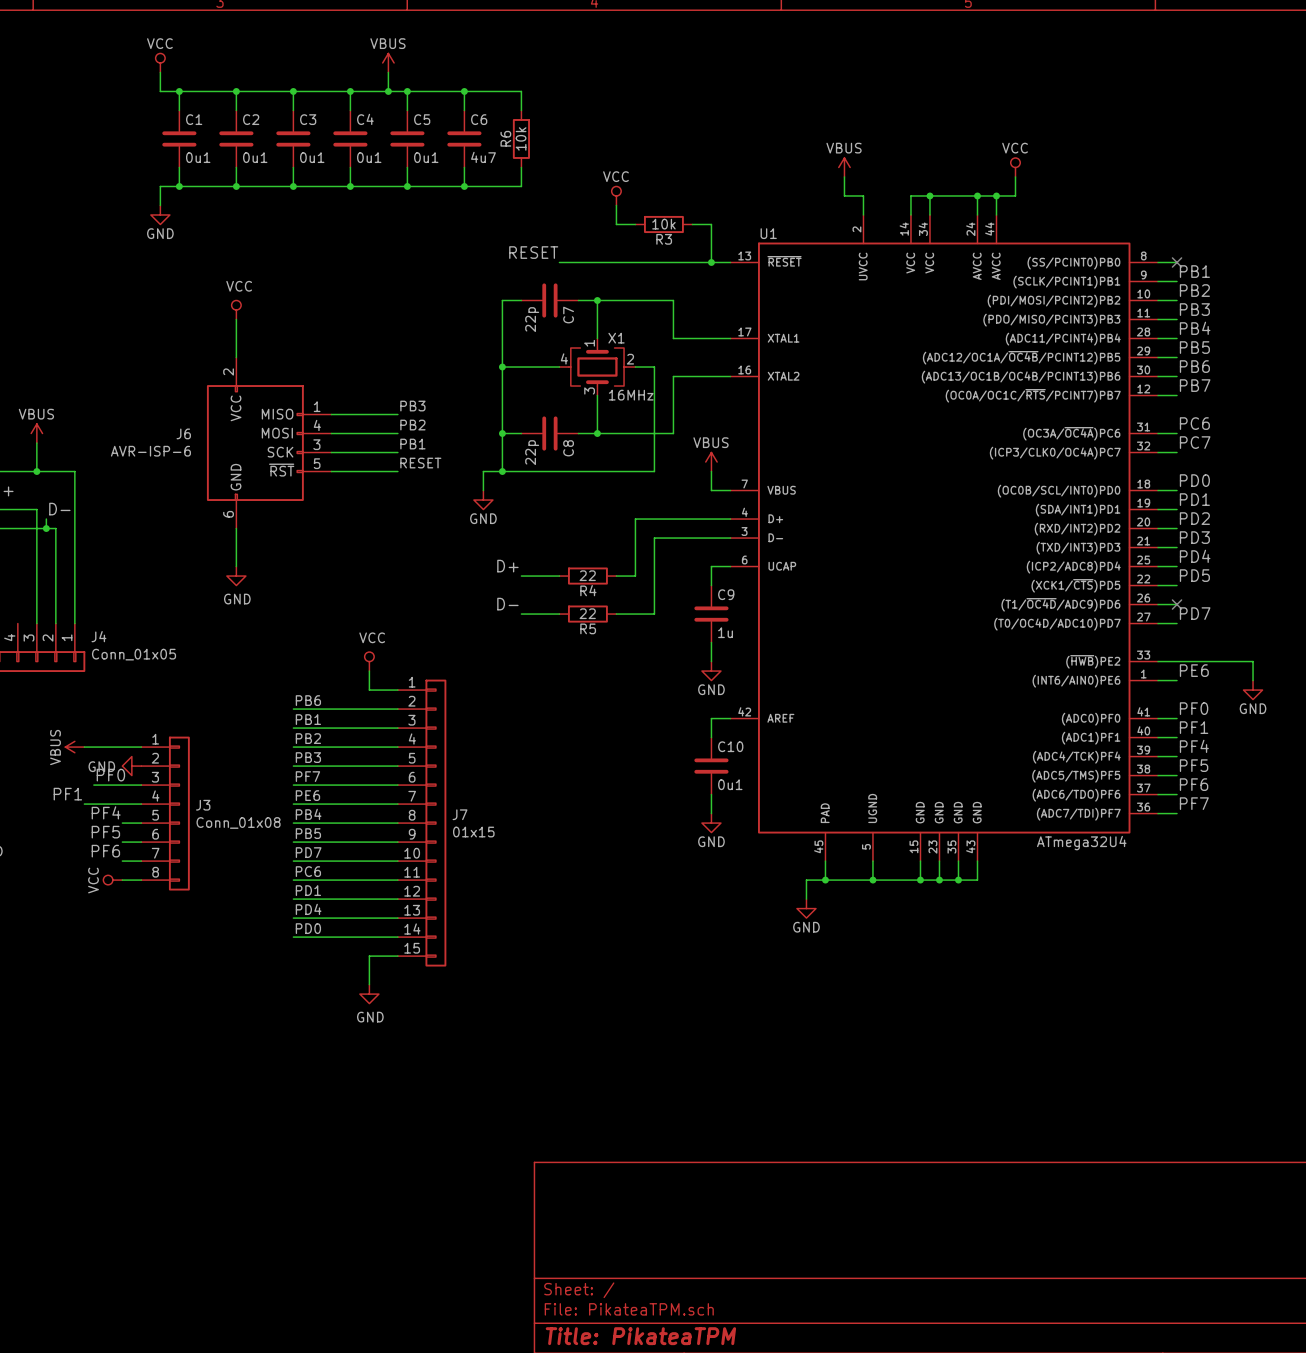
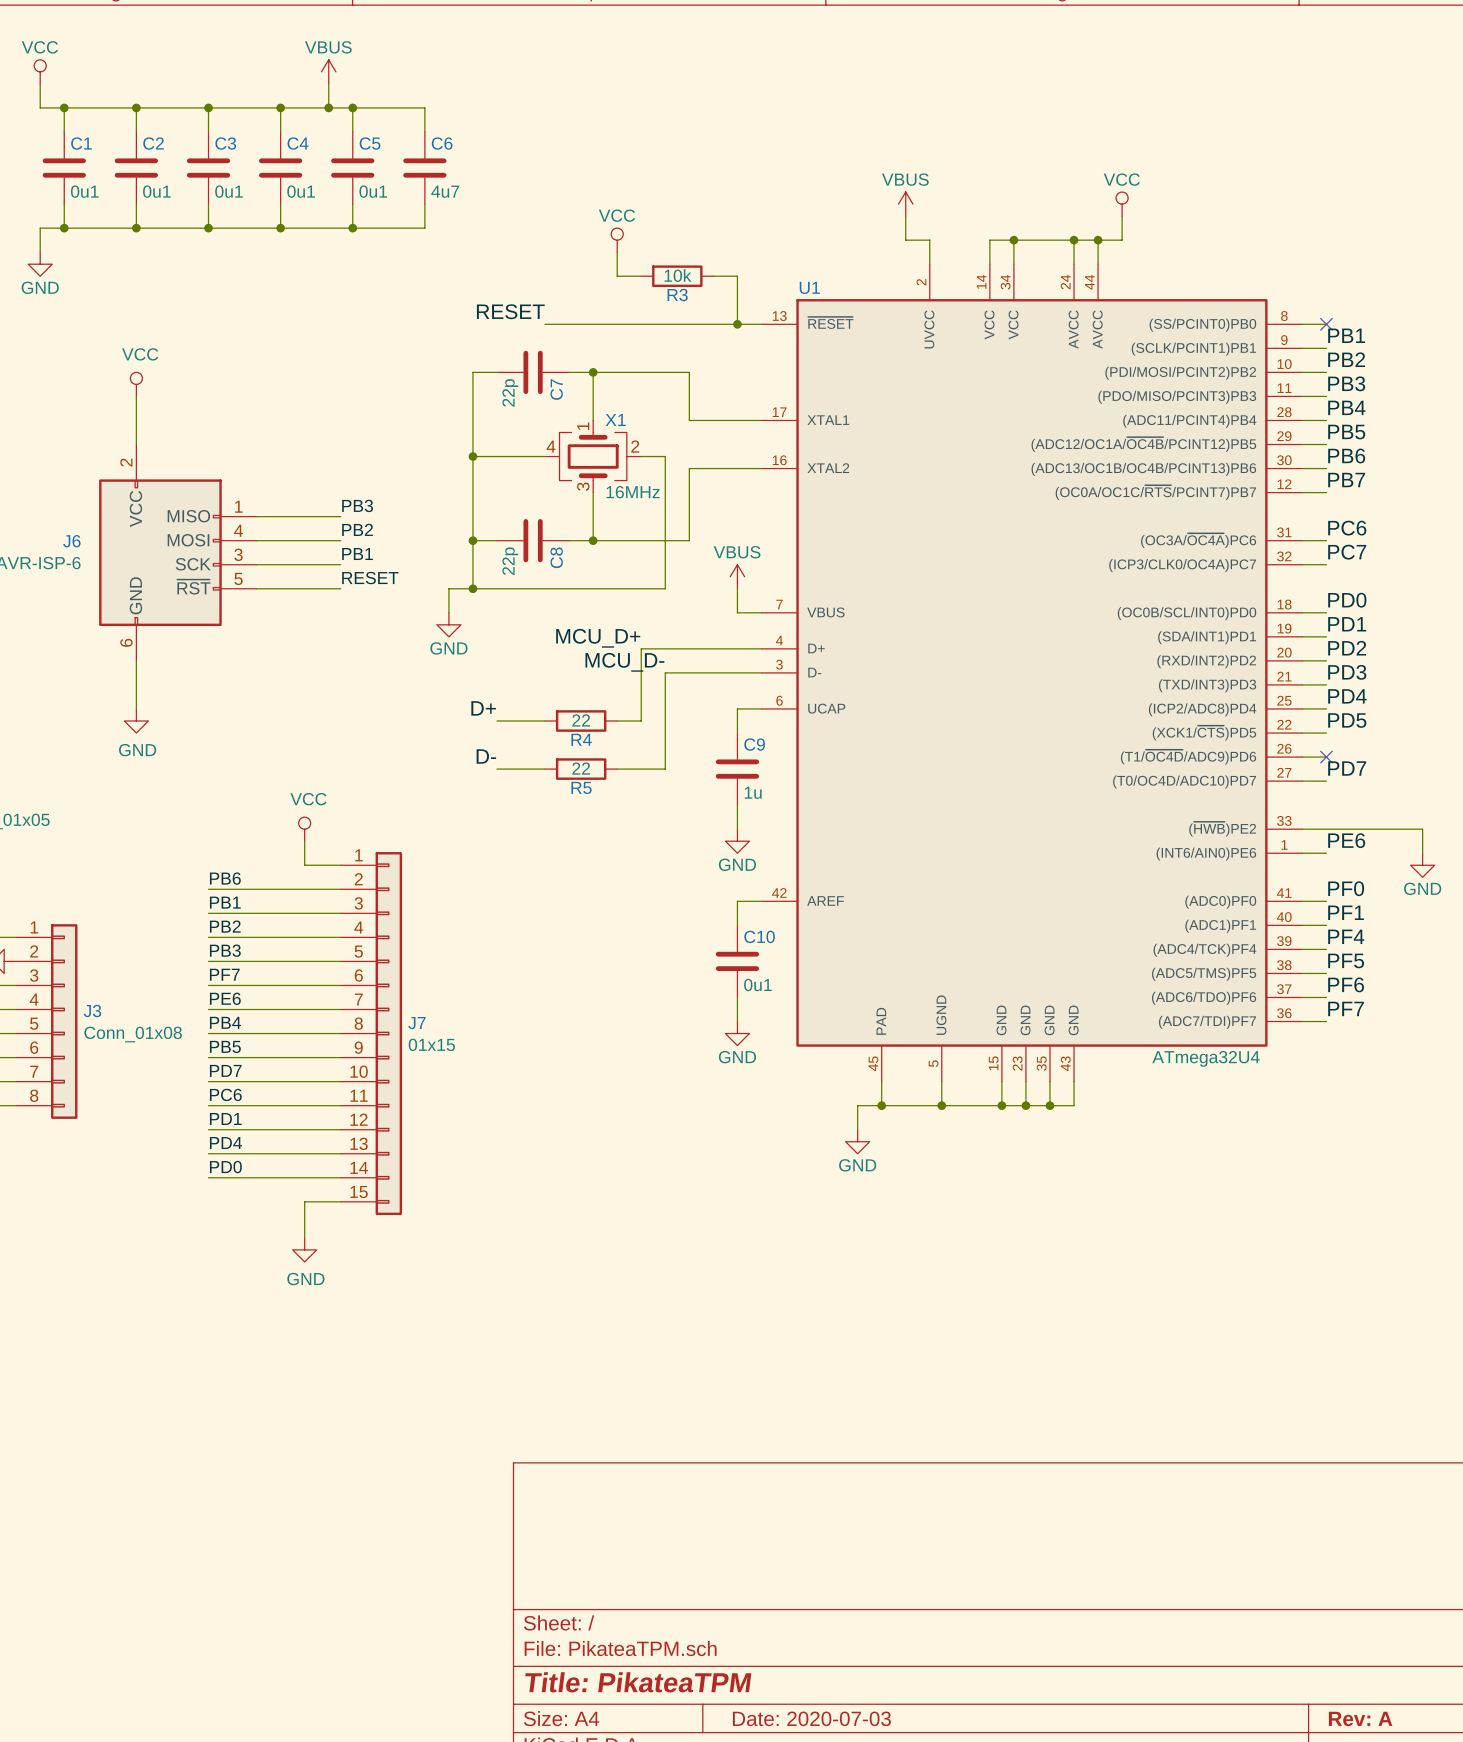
wire: (464, 91) (521, 91) (521, 110) -> none
junction: (464, 91) -> none
R6: 10k (521, 138) -> none
wire: (521, 167) (521, 186) (464, 186) -> none
junction: (464, 186) -> none
label: none -> MCU_D+ (598, 638)
label: none -> MCU_D- (624, 662)

